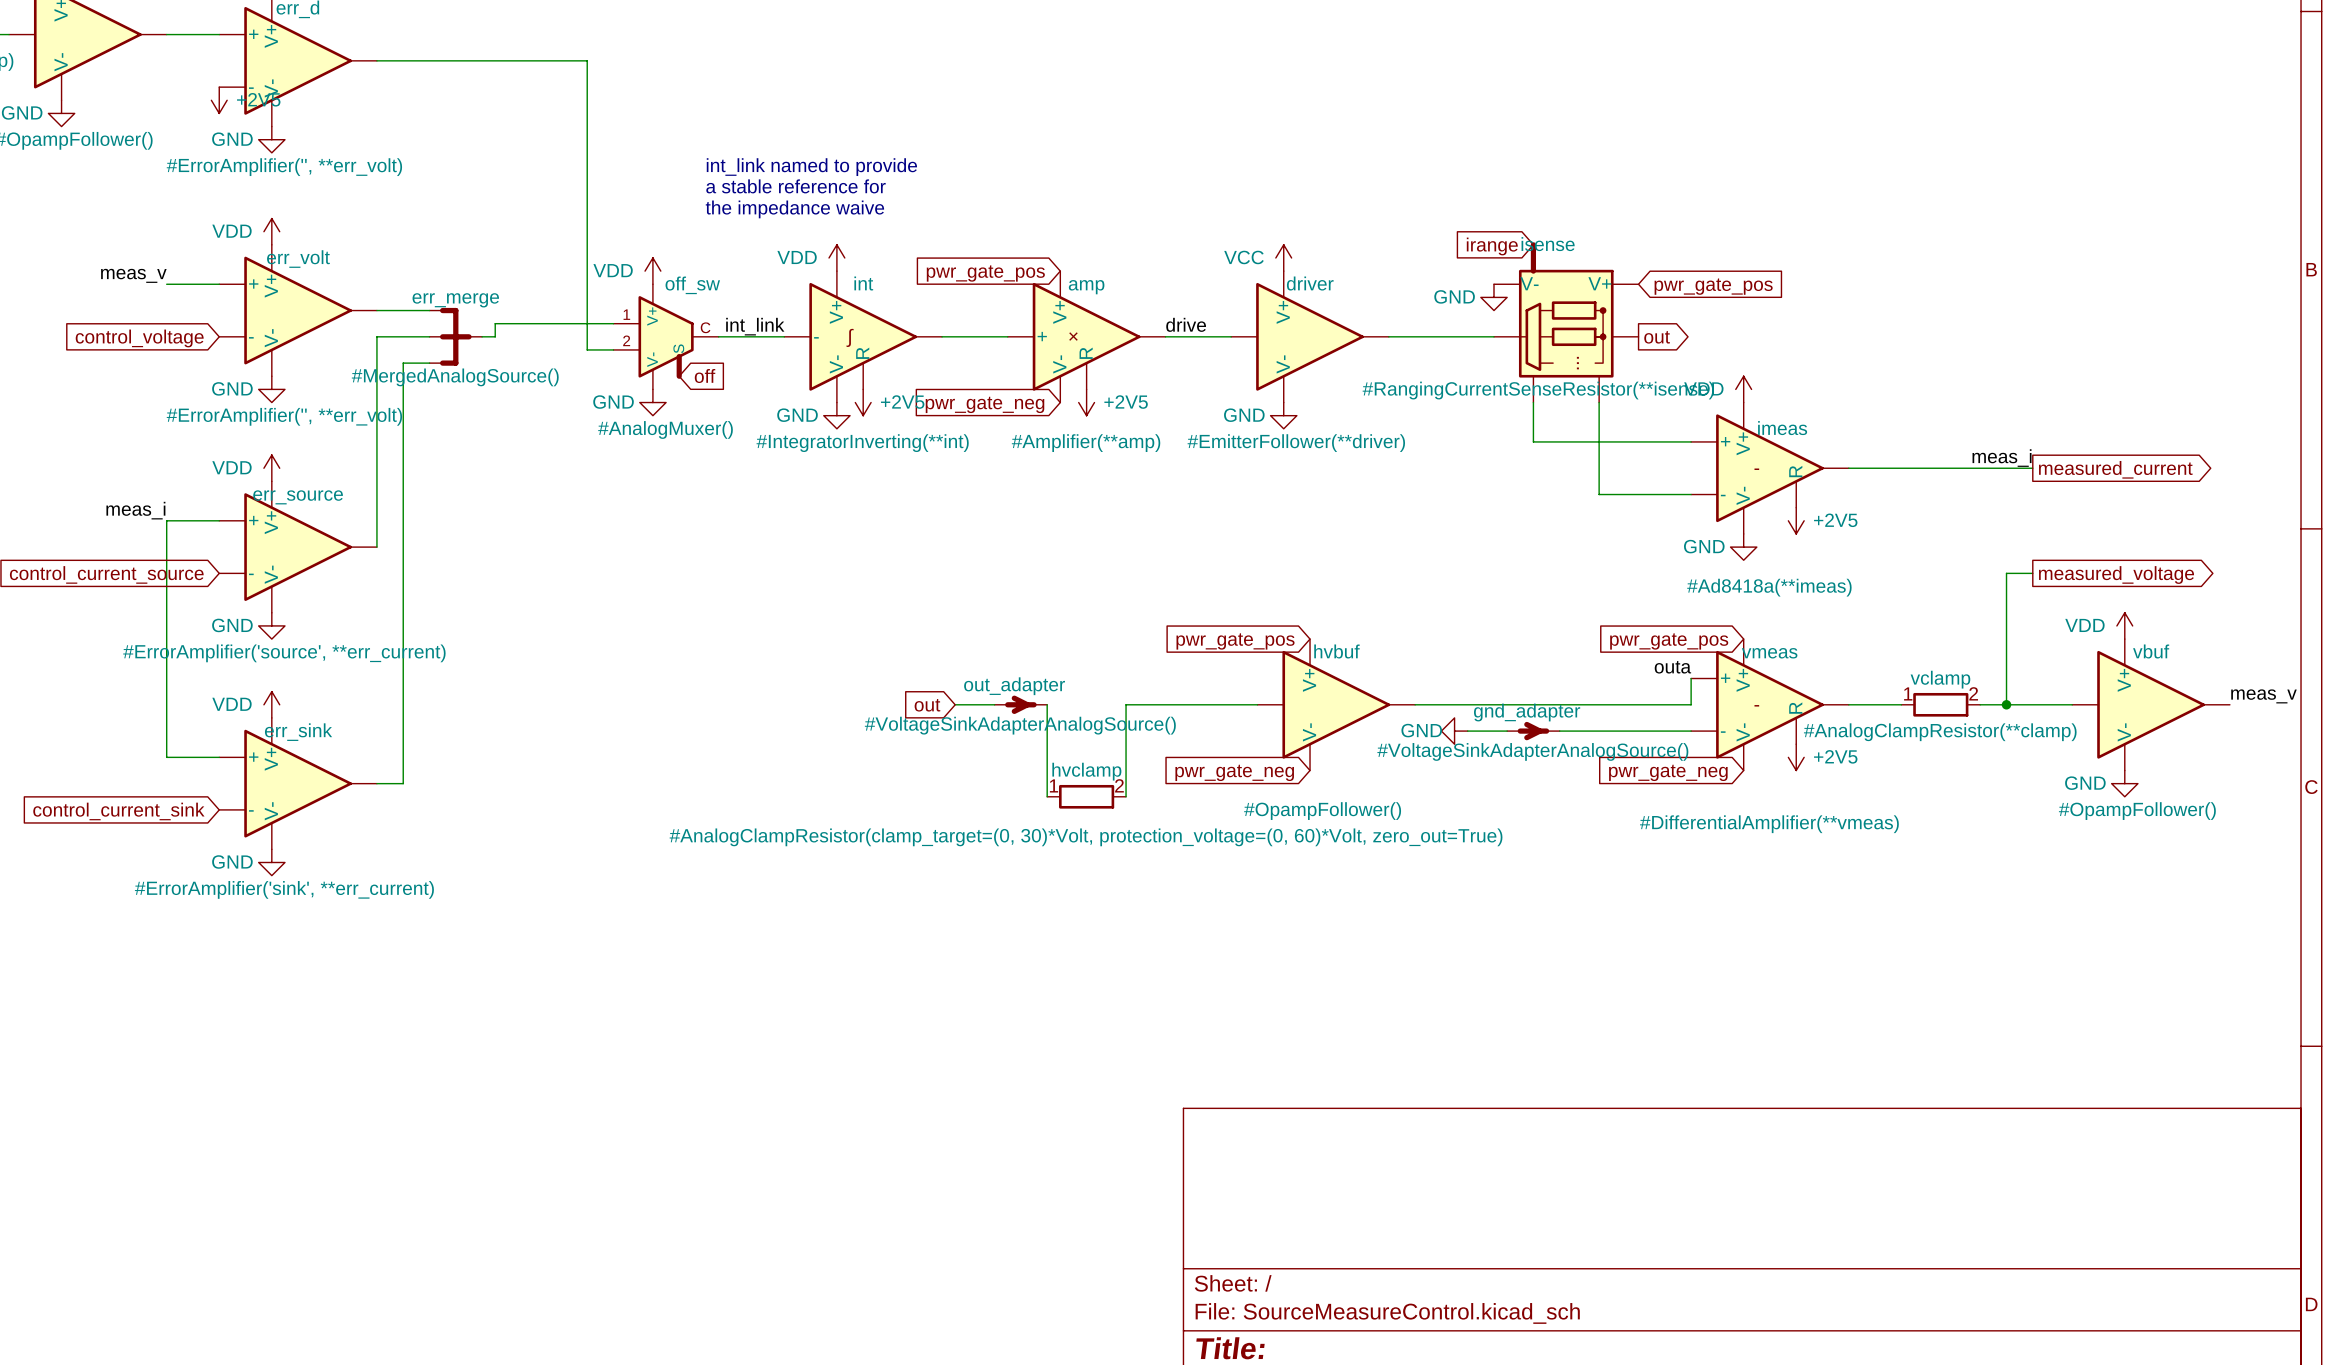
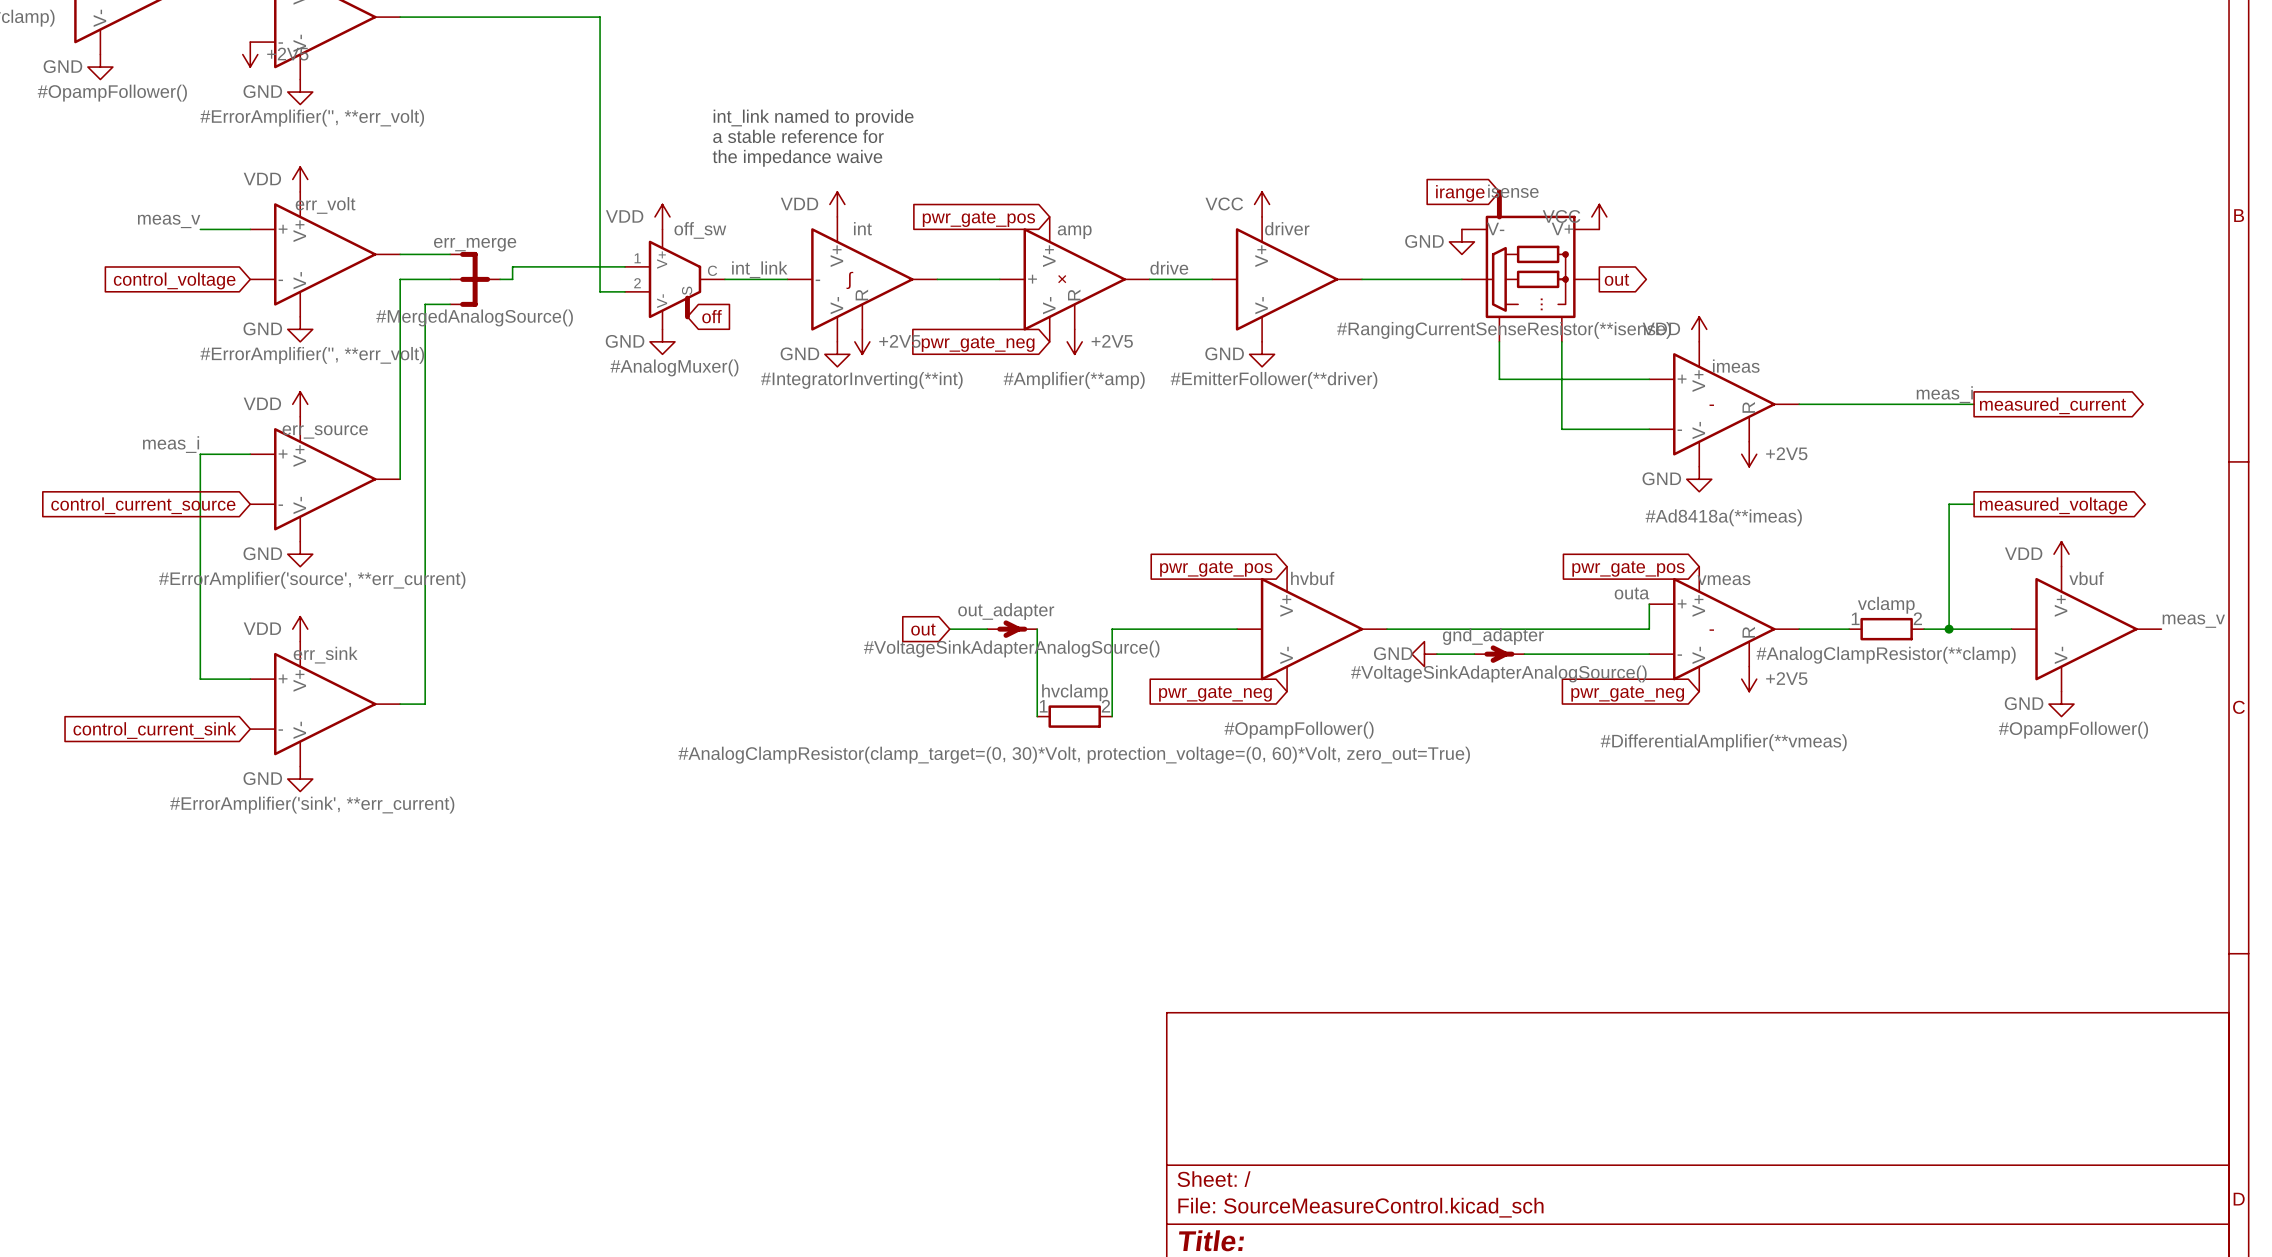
power symbol: none -> VCC (1599, 216)
global label: pwr_gate_pos (1713, 286) -> none

